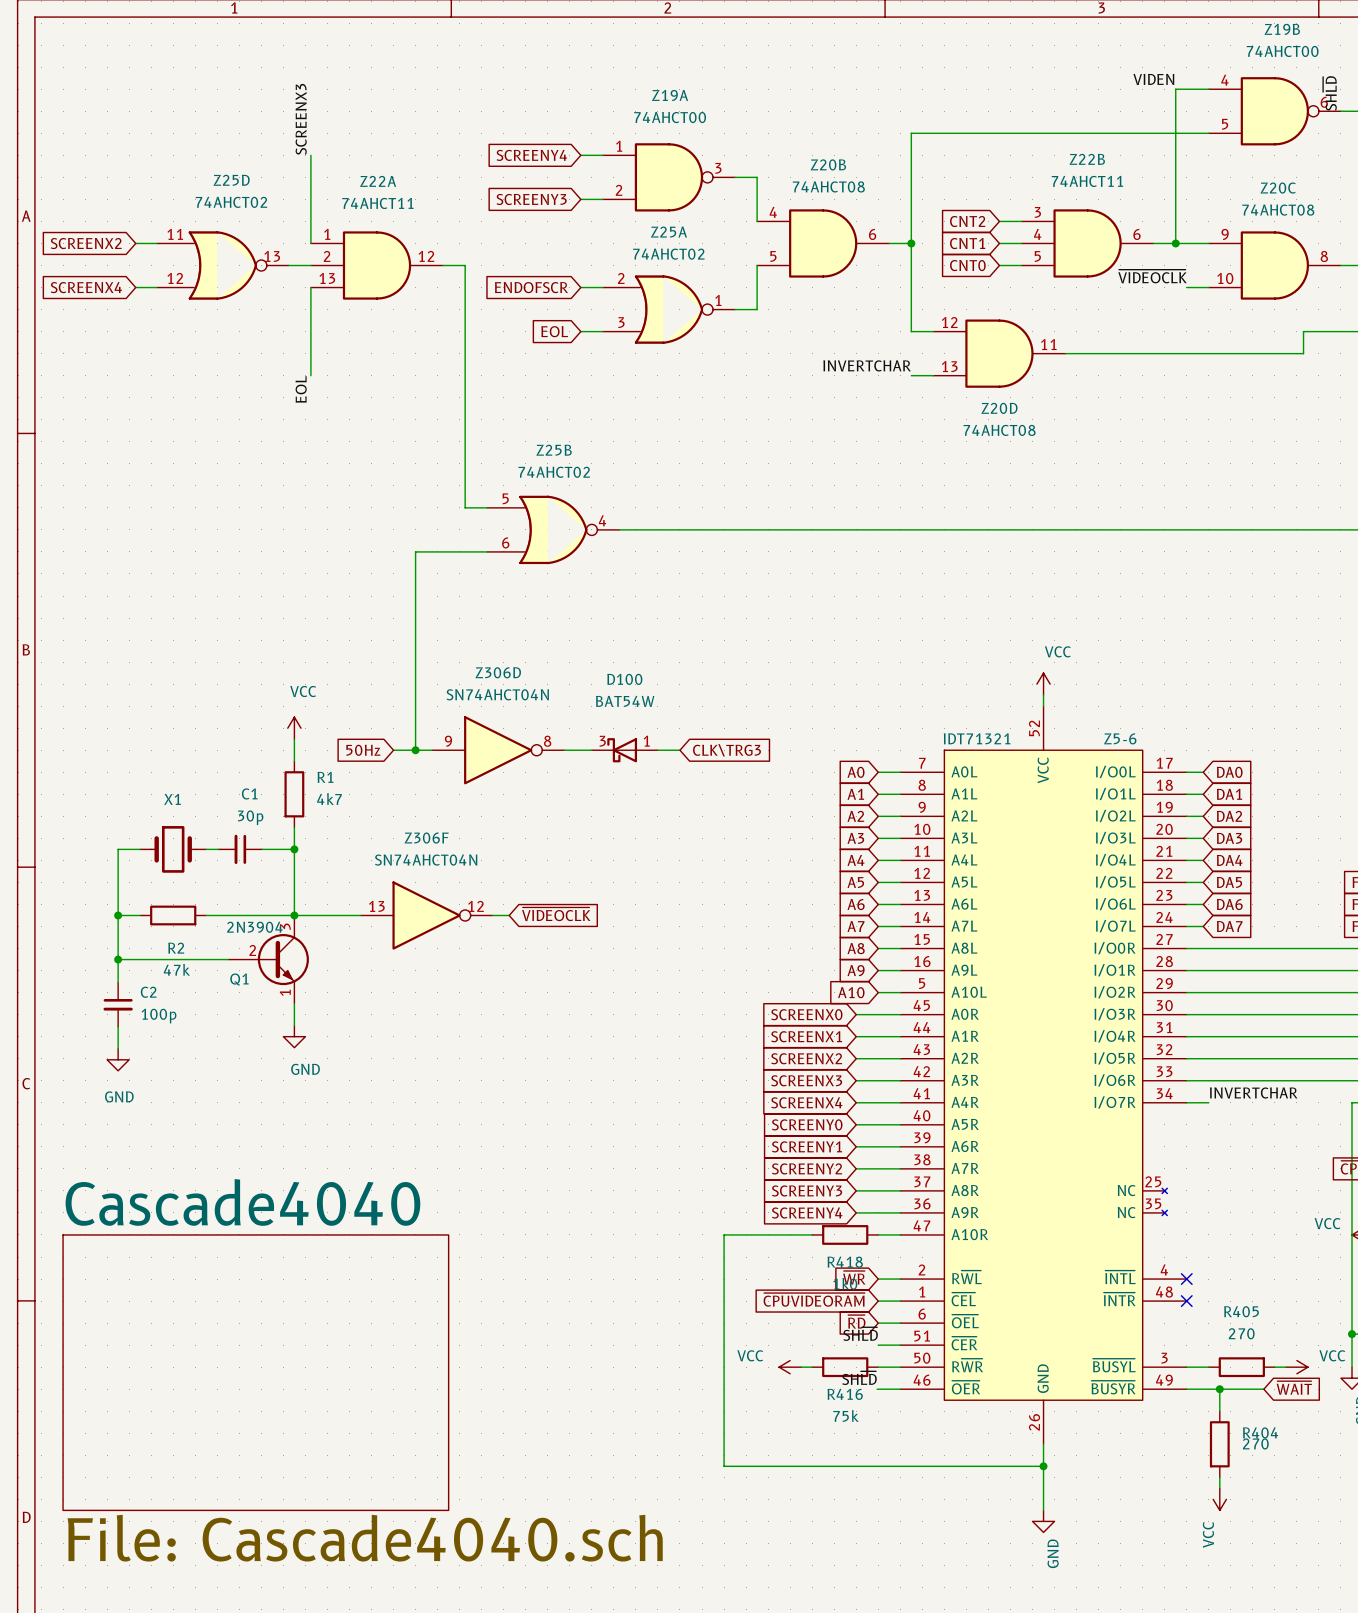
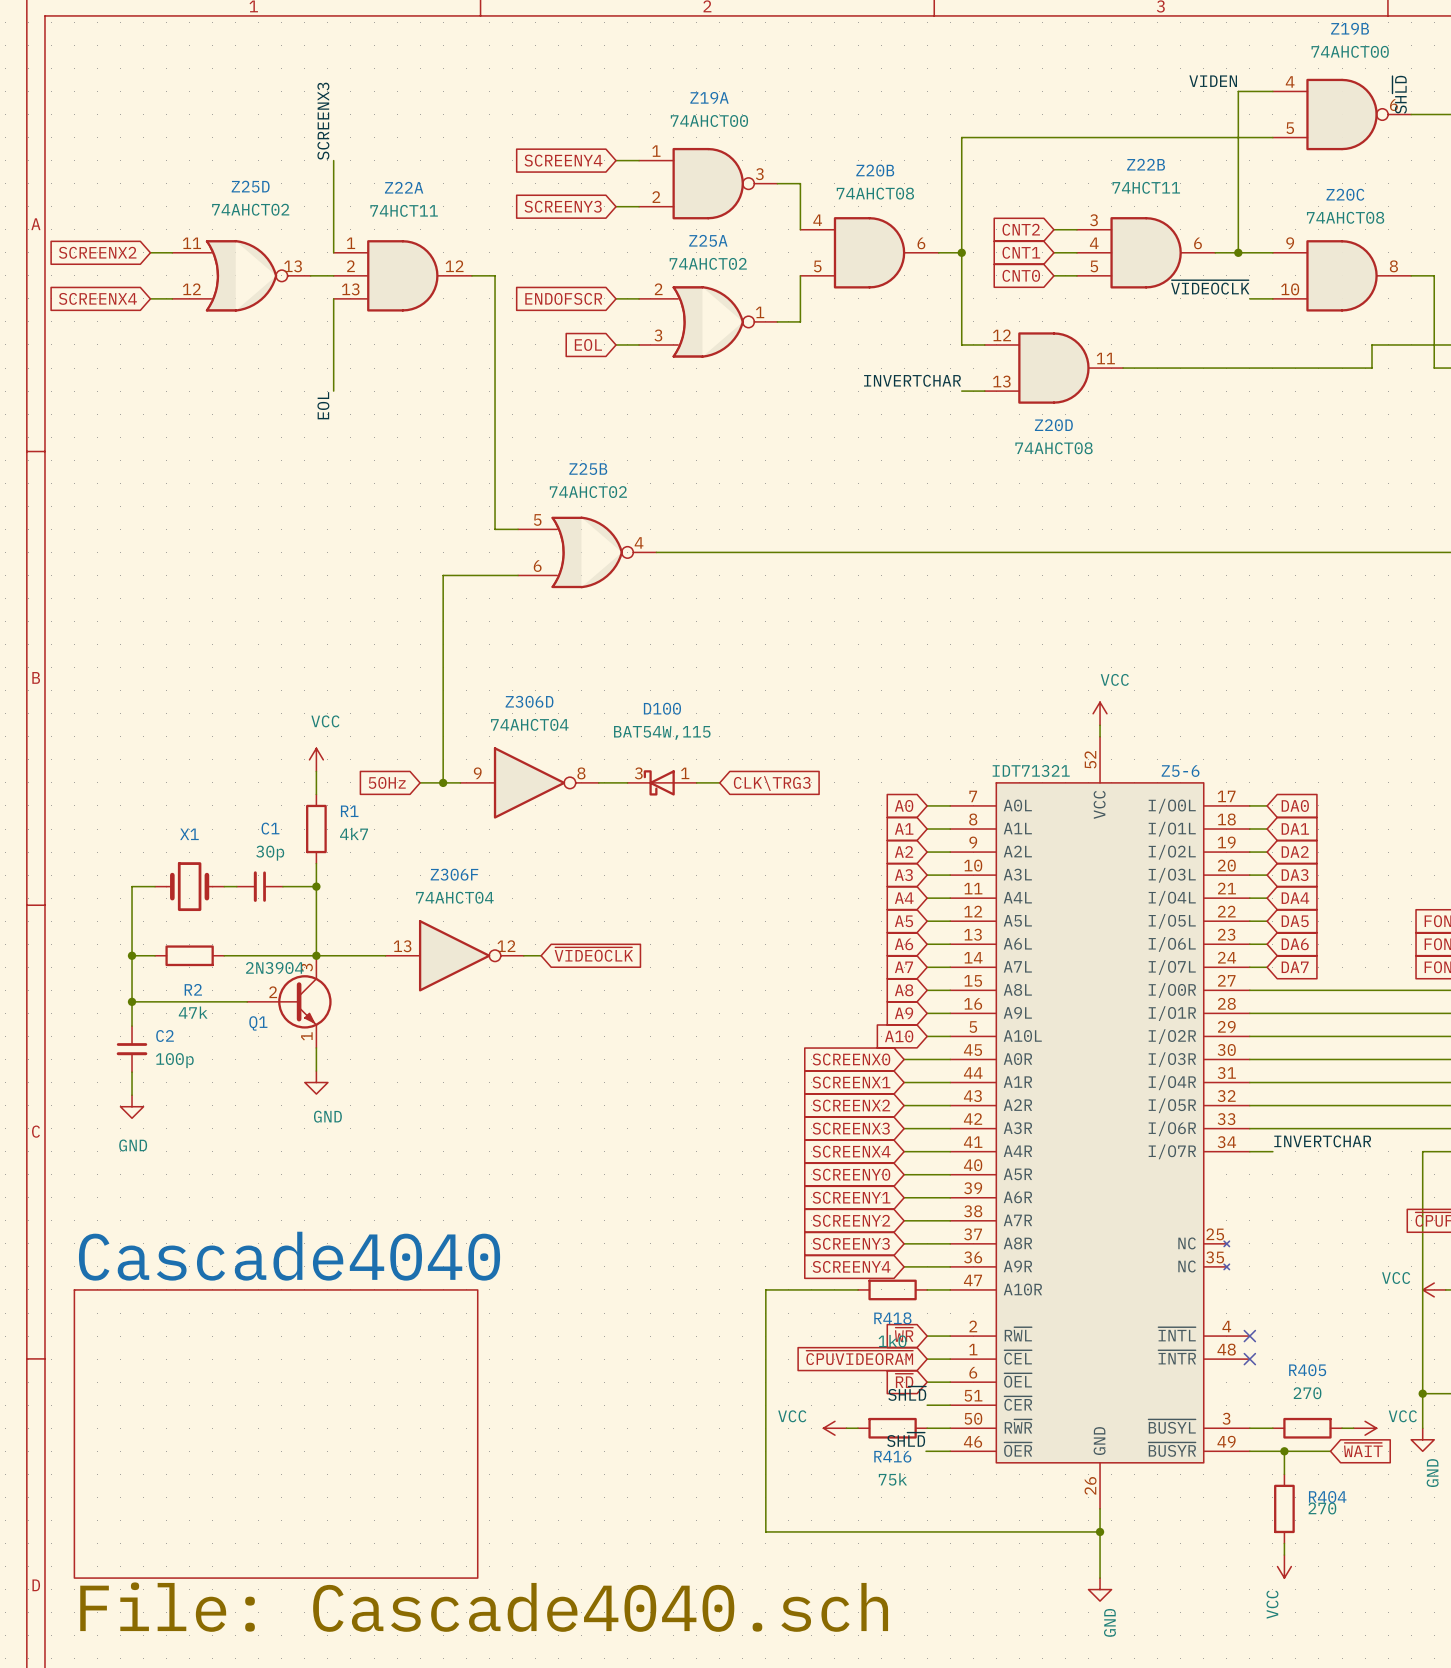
Z22B value: 74AHCT11 (1087, 181) -> 74HCT11 (1146, 187)
Z22A value: 74AHCT11 (377, 203) -> 74HCT11 (404, 210)
Z306D value: SN74AHCT04N (497, 694) -> 74AHCT04 (529, 724)
D100 value: BAT54W (625, 701) -> BAT54W,115 (662, 732)
Z306F value: SN74AHCT04N (426, 860) -> 74AHCT04 (454, 897)

